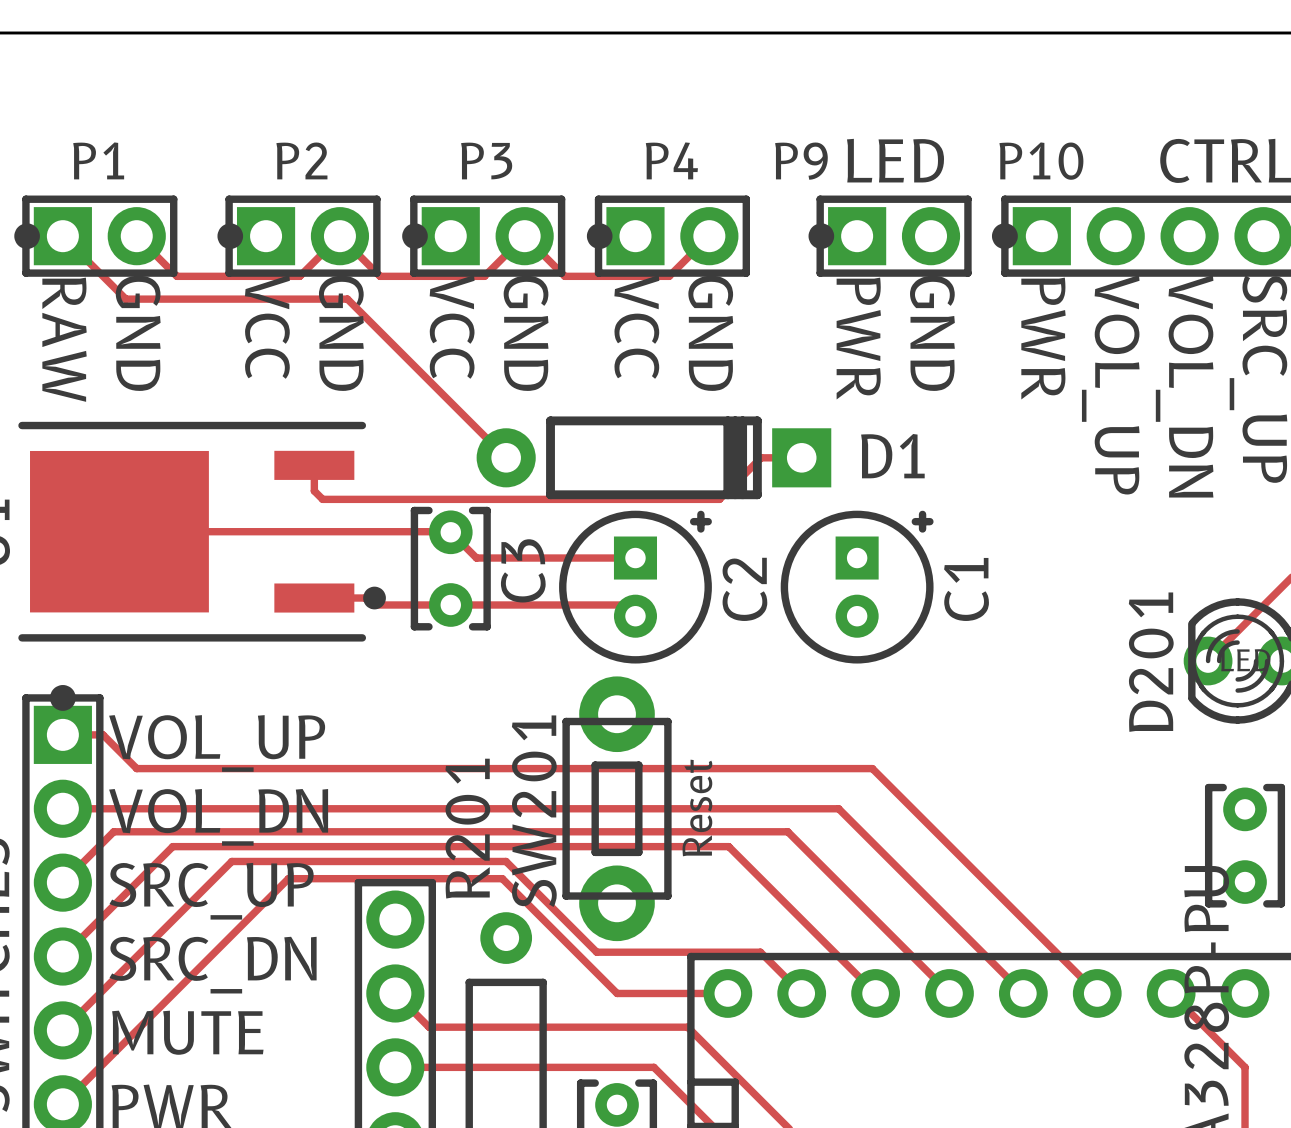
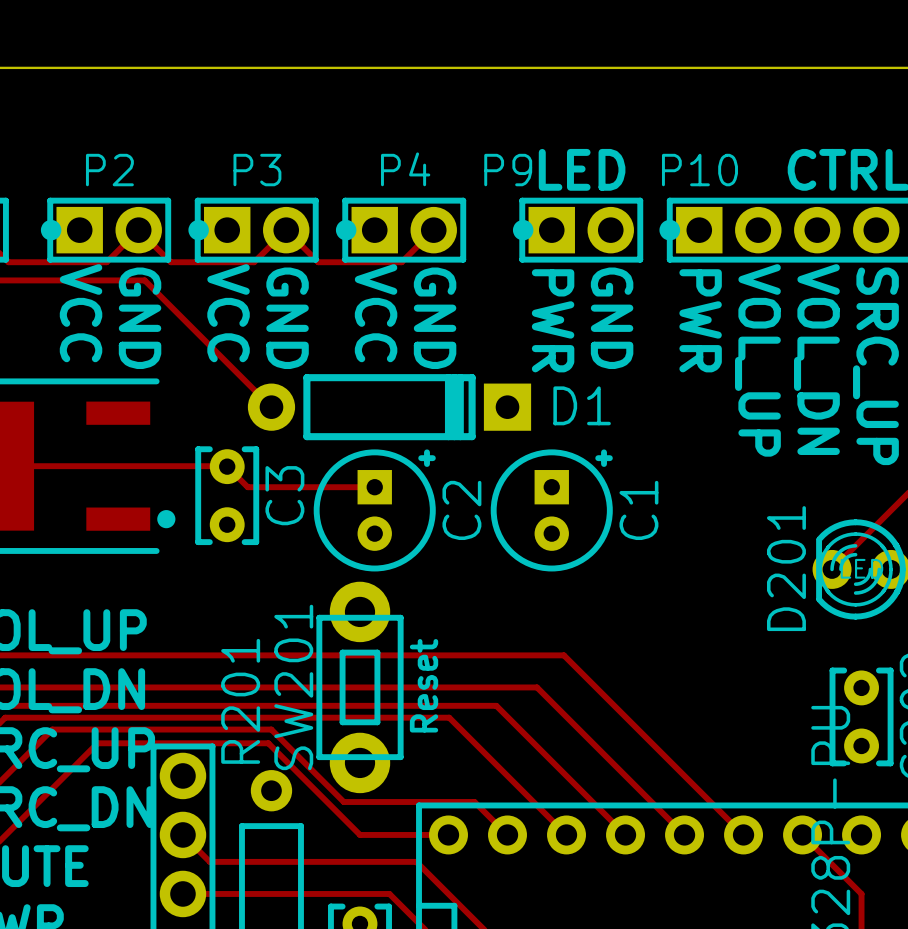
track: (801, 457) (761, 457) (719, 499) (322, 499) (314, 491) (314, 465) -> none
track: (314, 598) (365, 598) (372, 604) (624, 604) (635, 616) -> none

